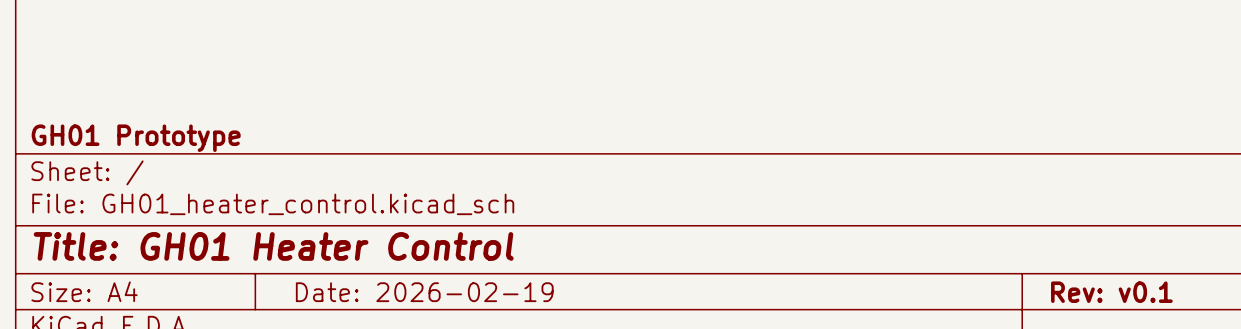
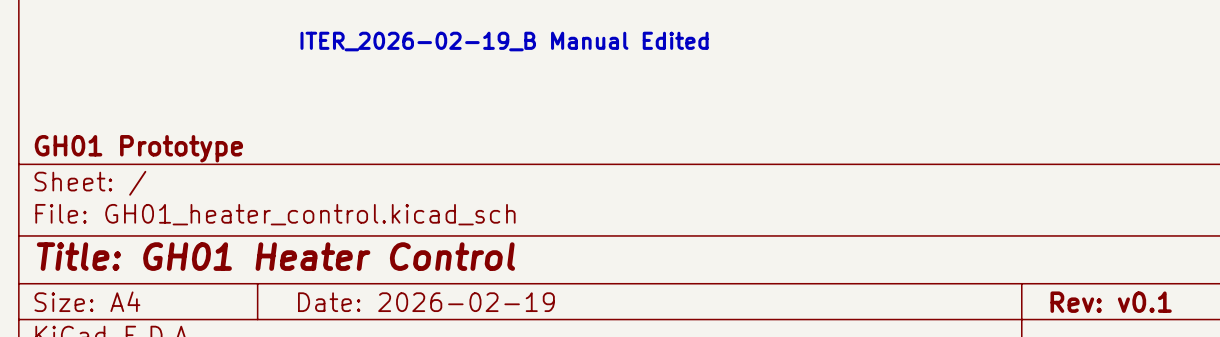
text: none -> ITER_2026-02-19_B Manual Edited (504, 41)

